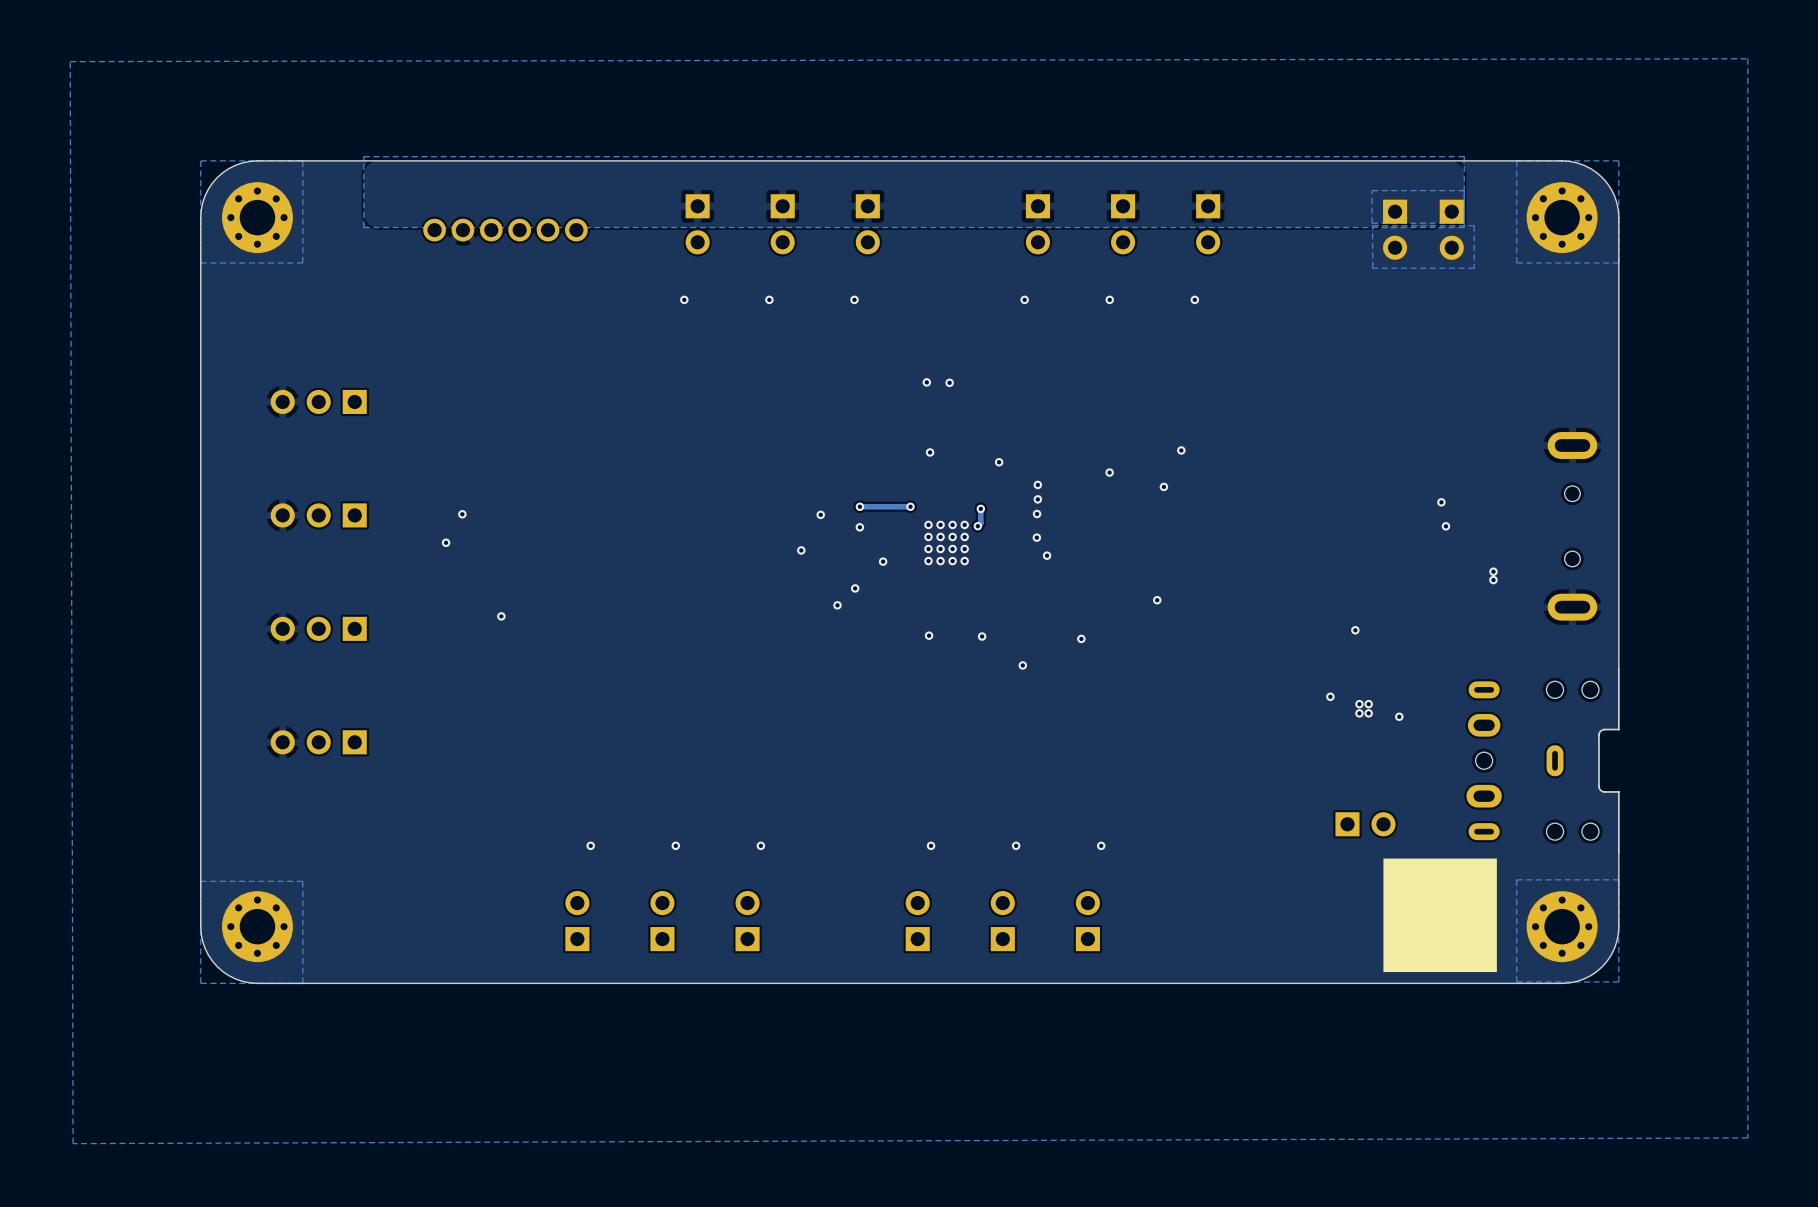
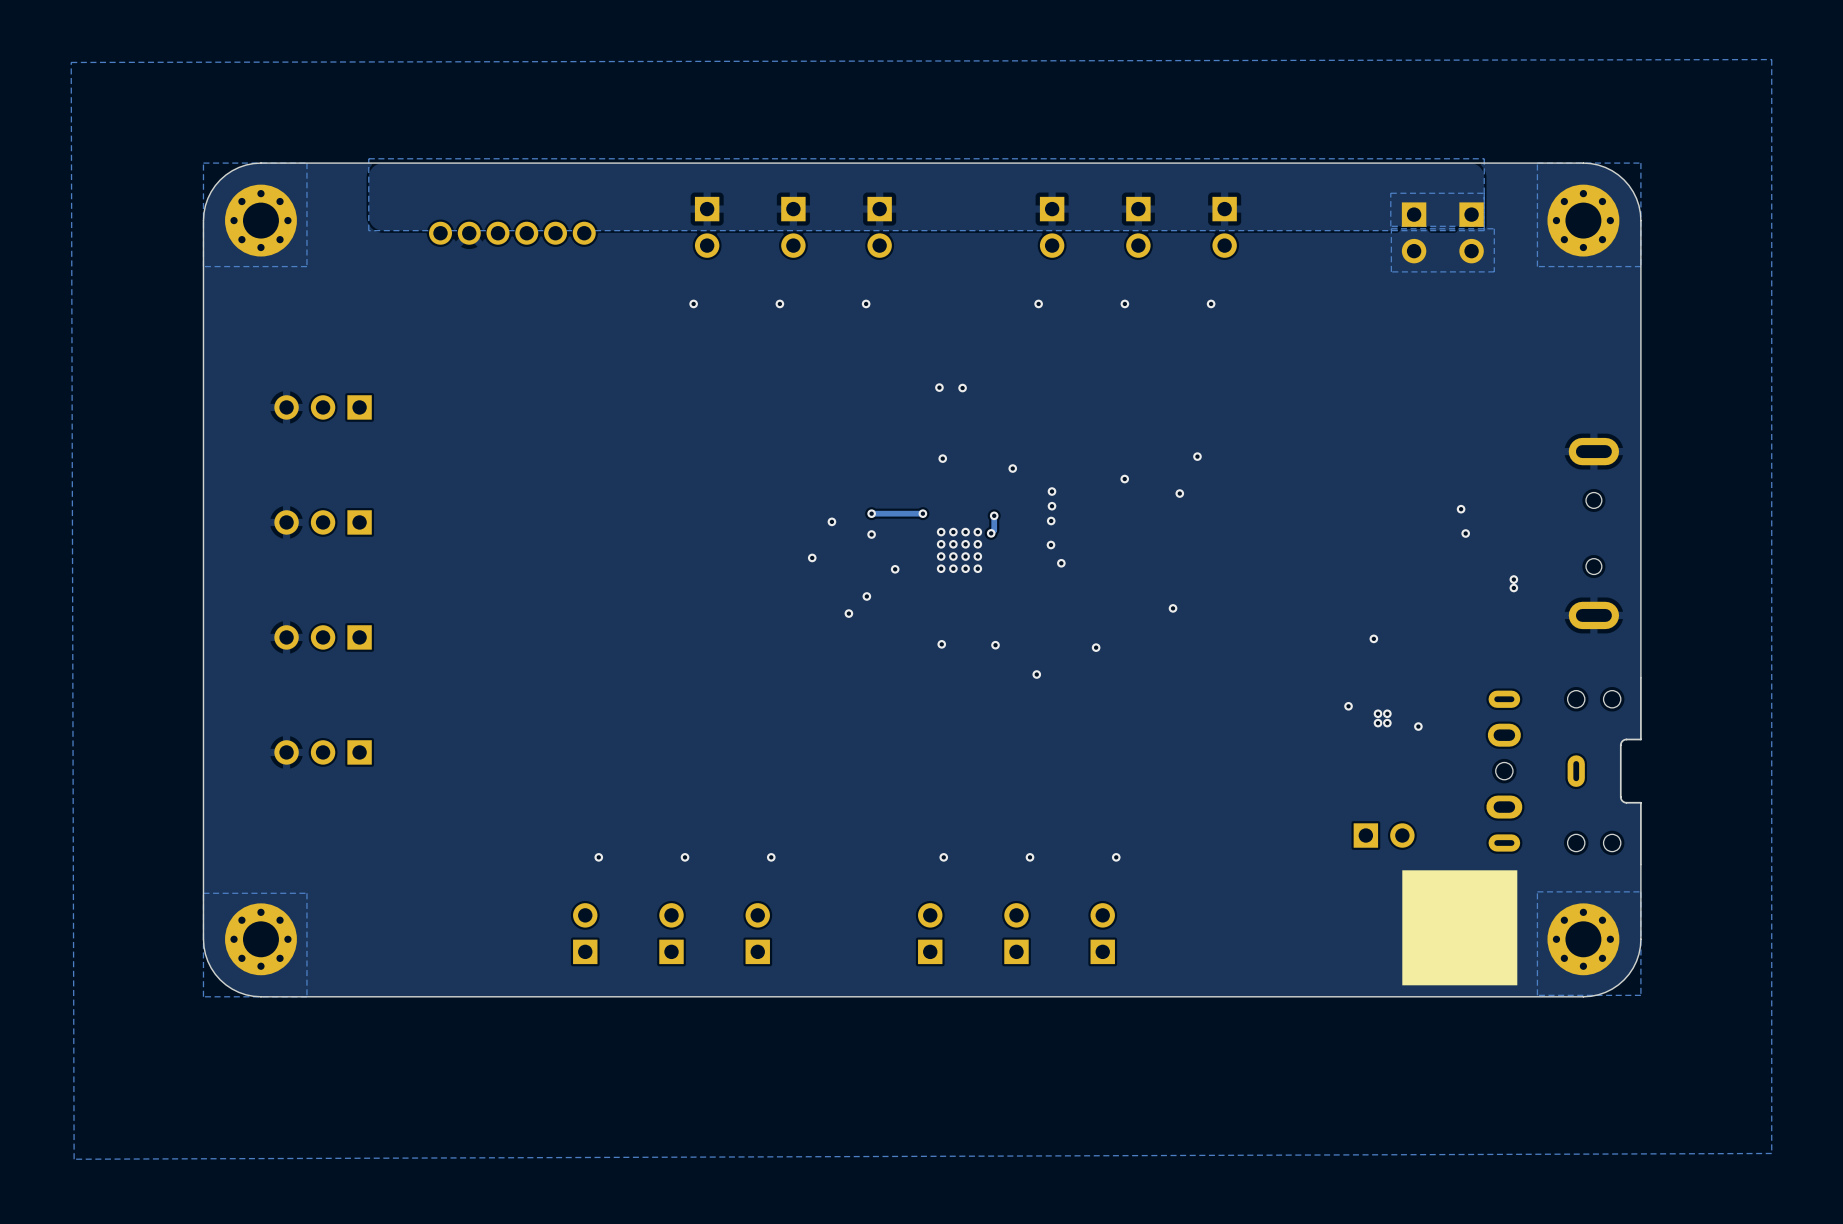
via: (462, 514) -> none
via: (446, 542) -> none
via: (501, 616) -> none

